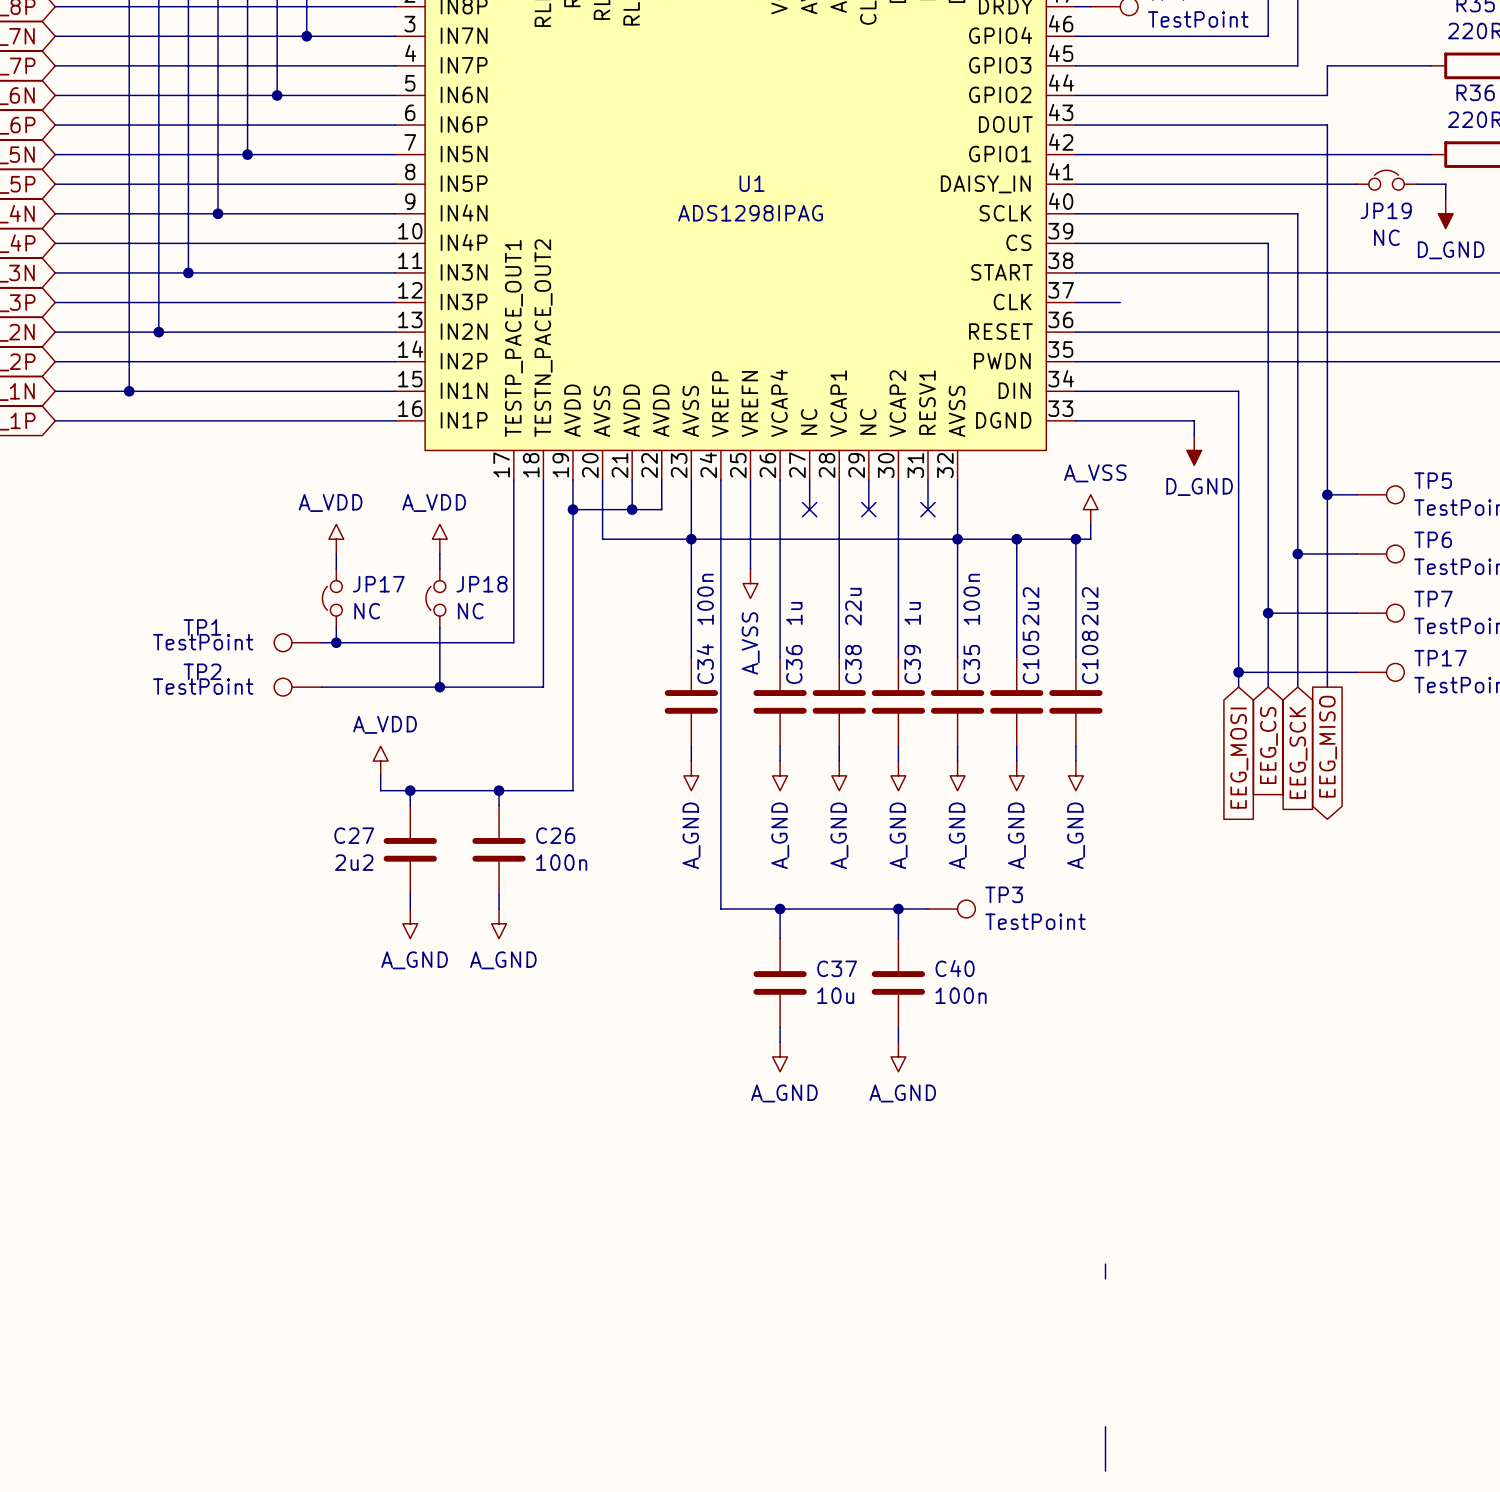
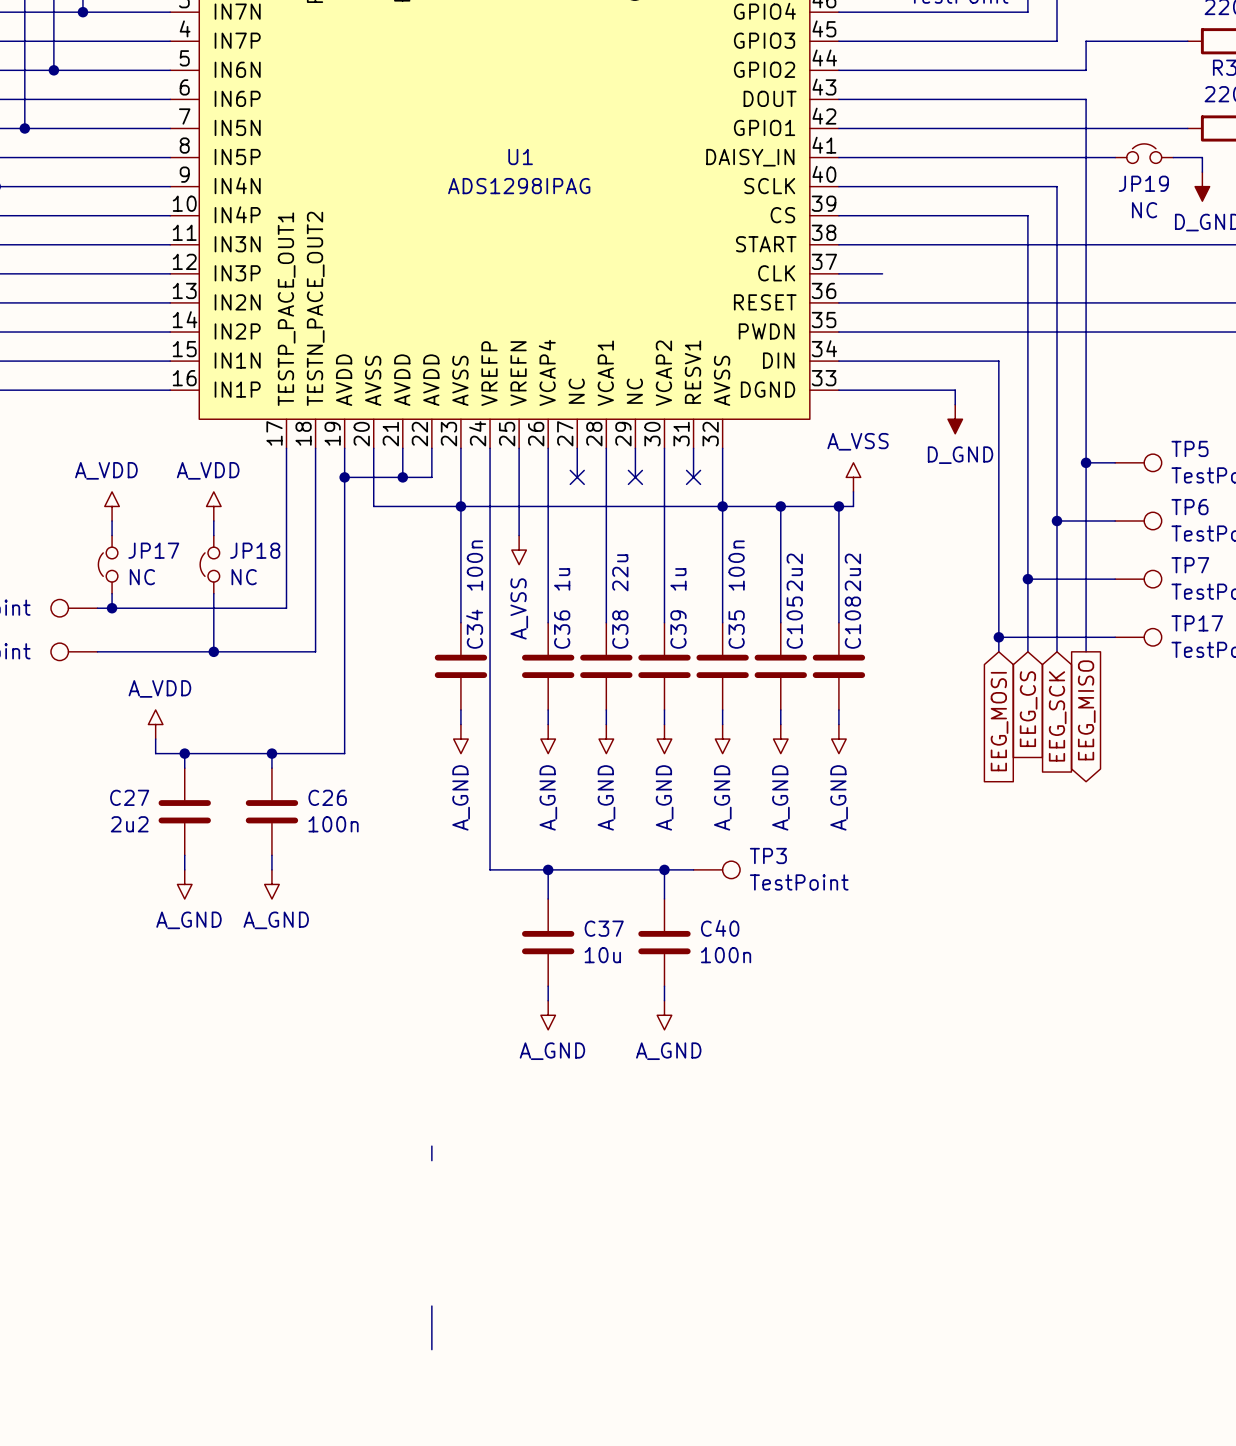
wire: none -> (431, 1146) (431, 1160)
wire: (1105, 1264) (1105, 1278) -> none
wire: none -> (431, 1306) (431, 1349)
wire: (1105, 1426) (1105, 1471) -> none

